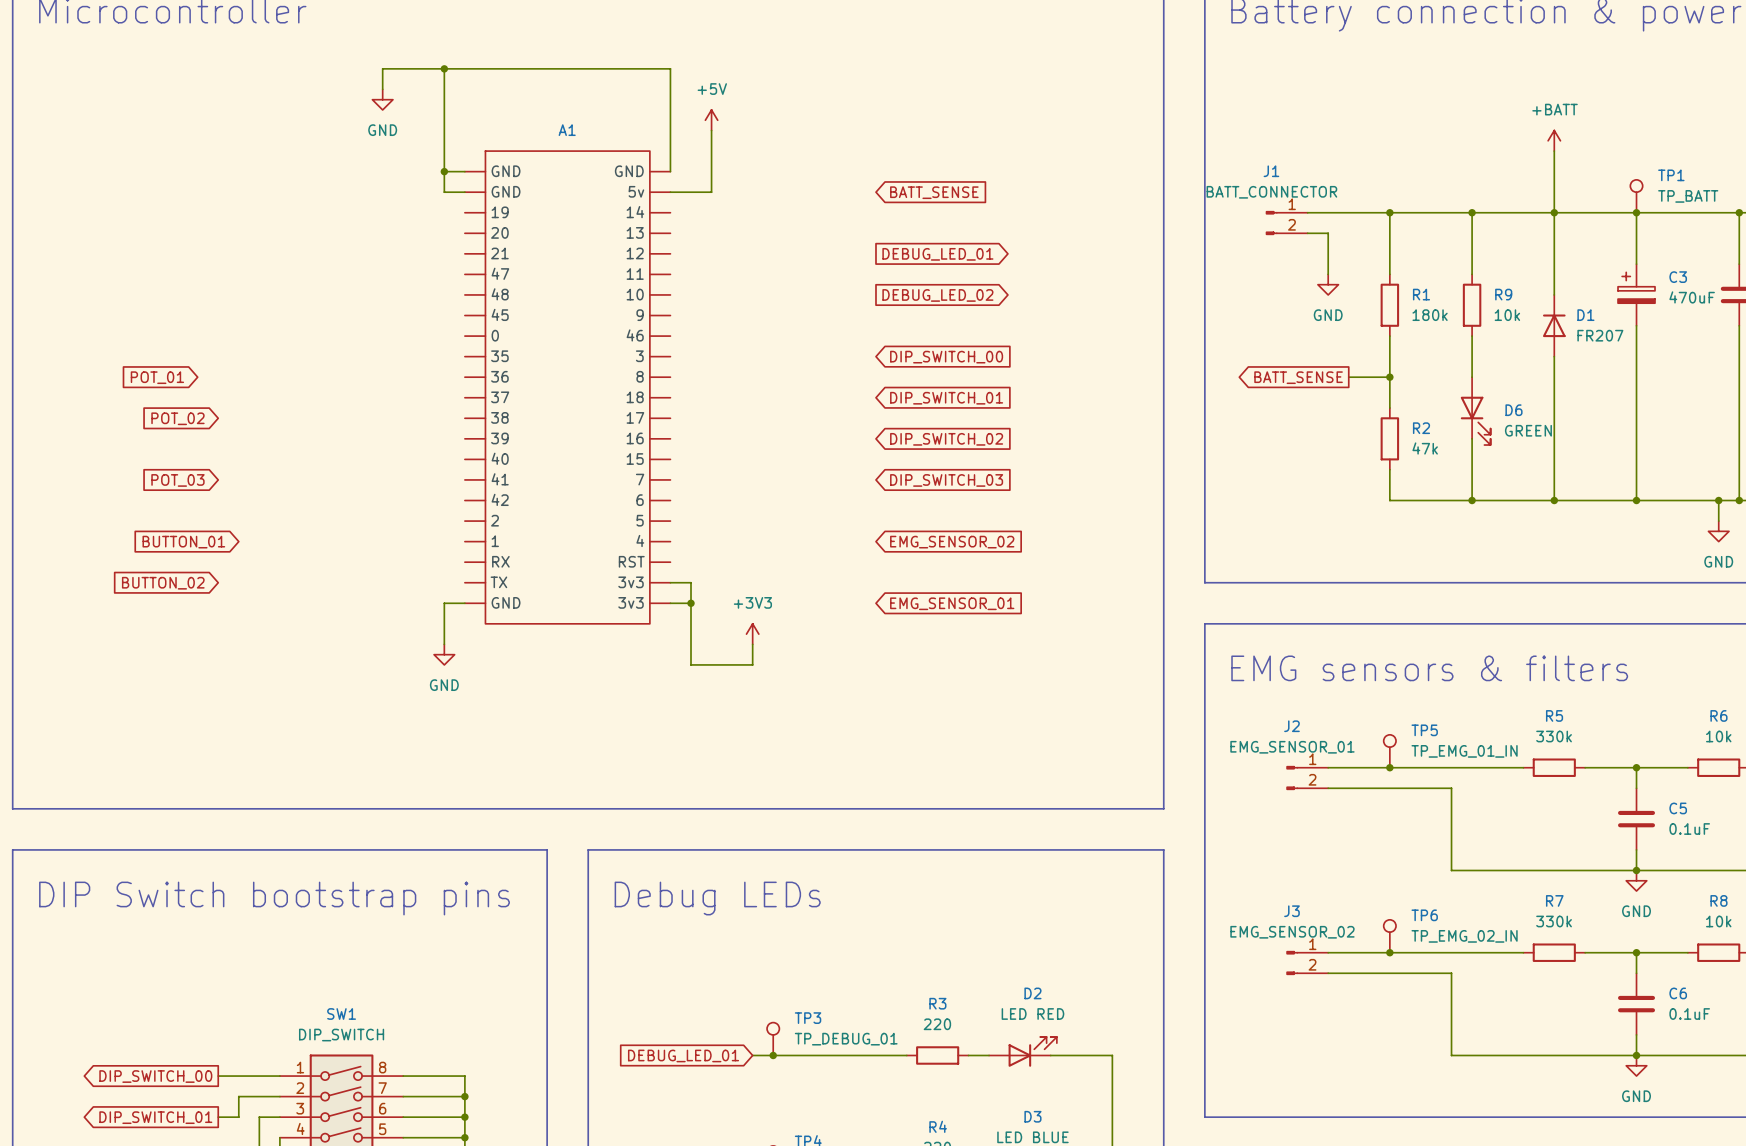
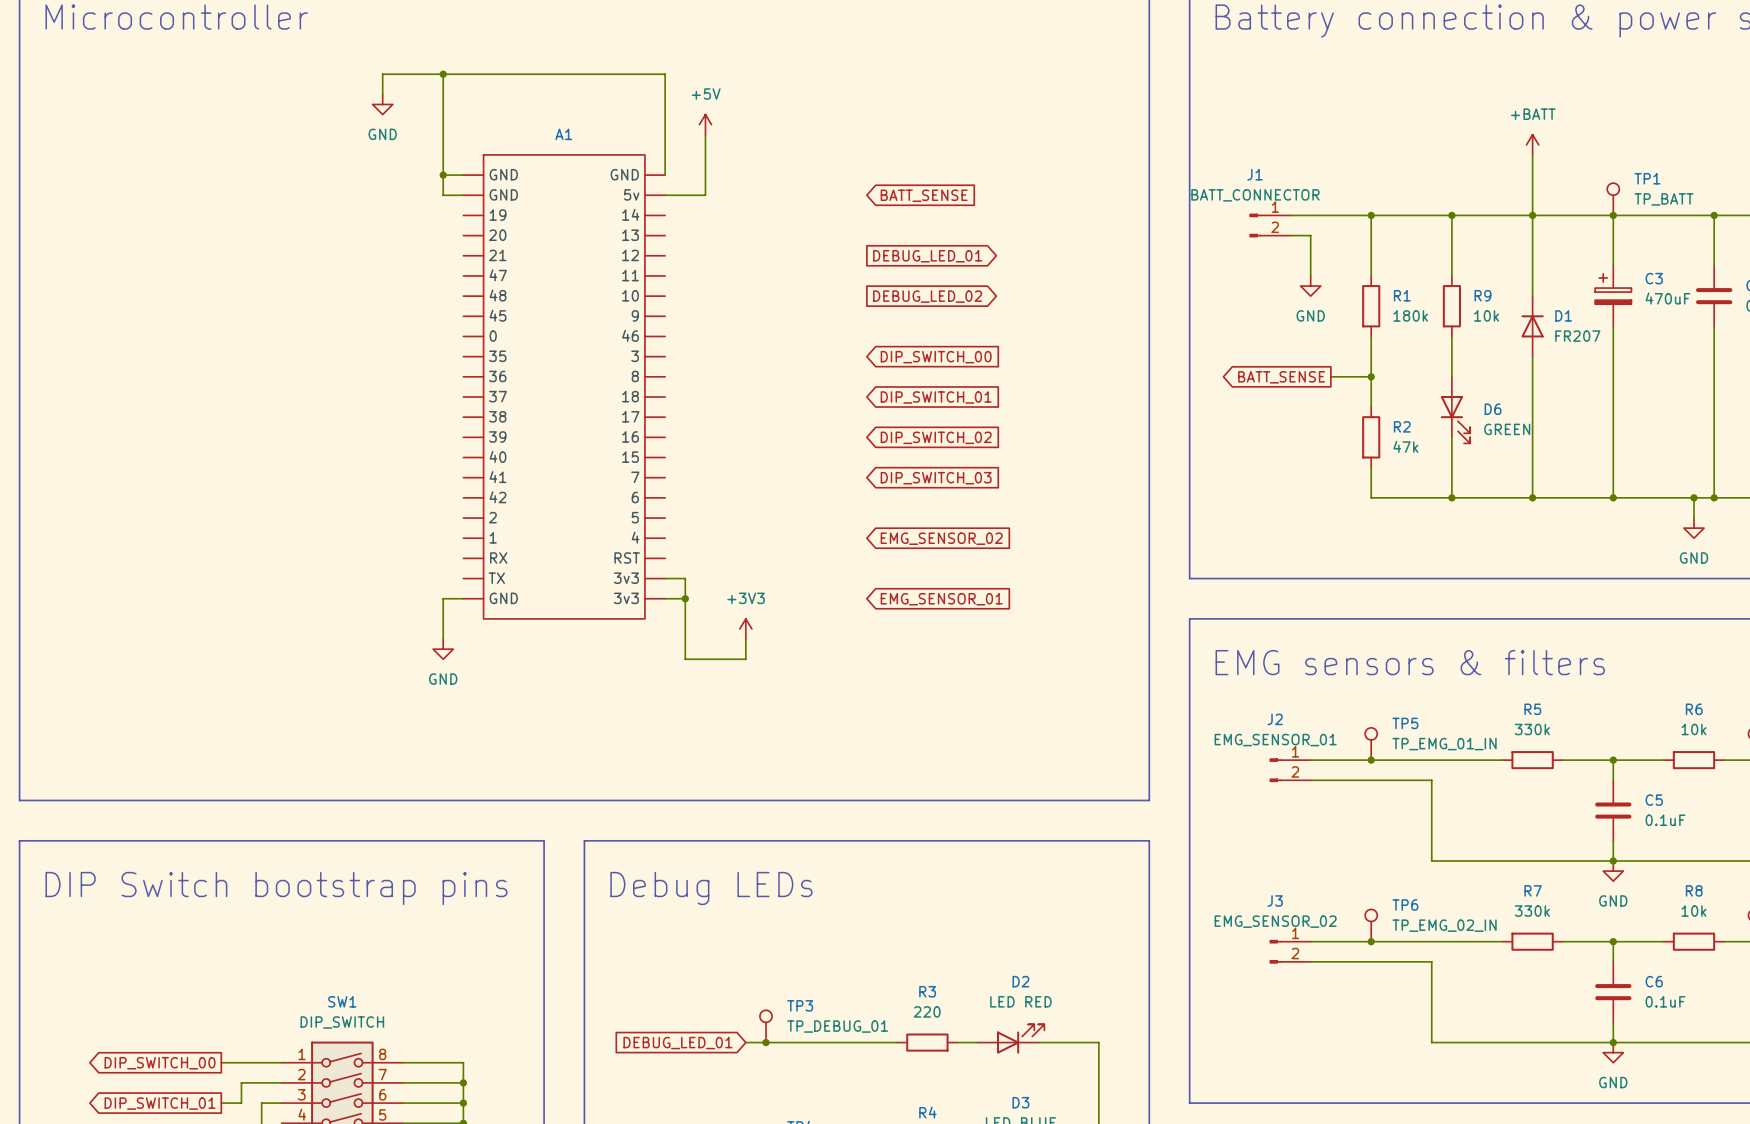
global label: POT_01 (157, 377) -> none
global label: POT_02 (177, 418) -> none
global label: POT_03 (177, 480) -> none
global label: BUTTON_01 (183, 542) -> none
global label: BUTTON_02 (163, 583) -> none

